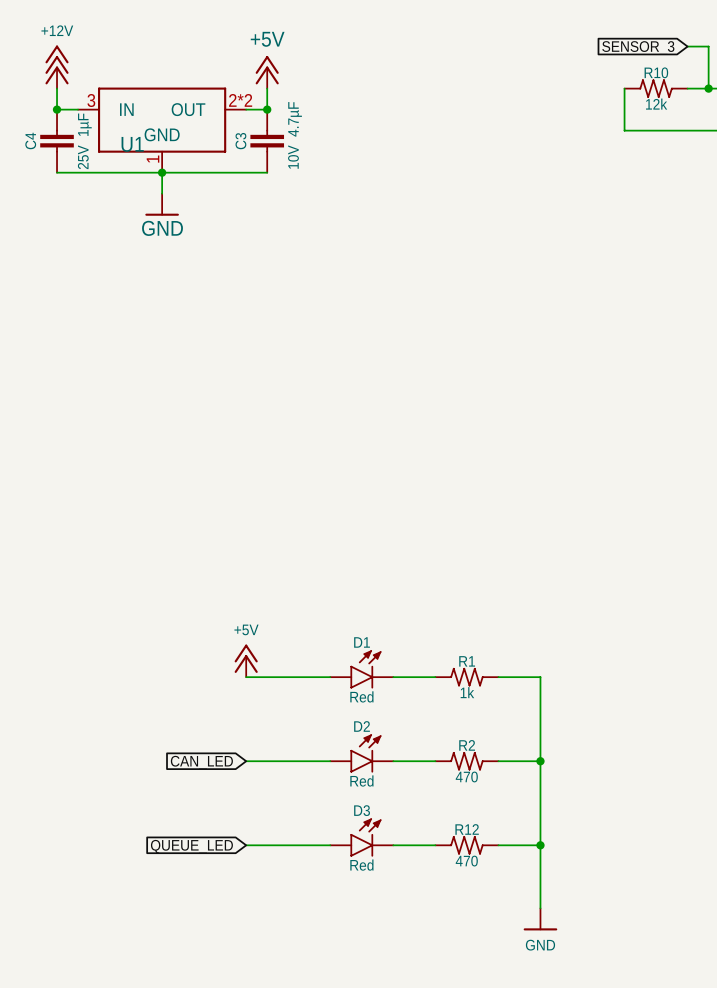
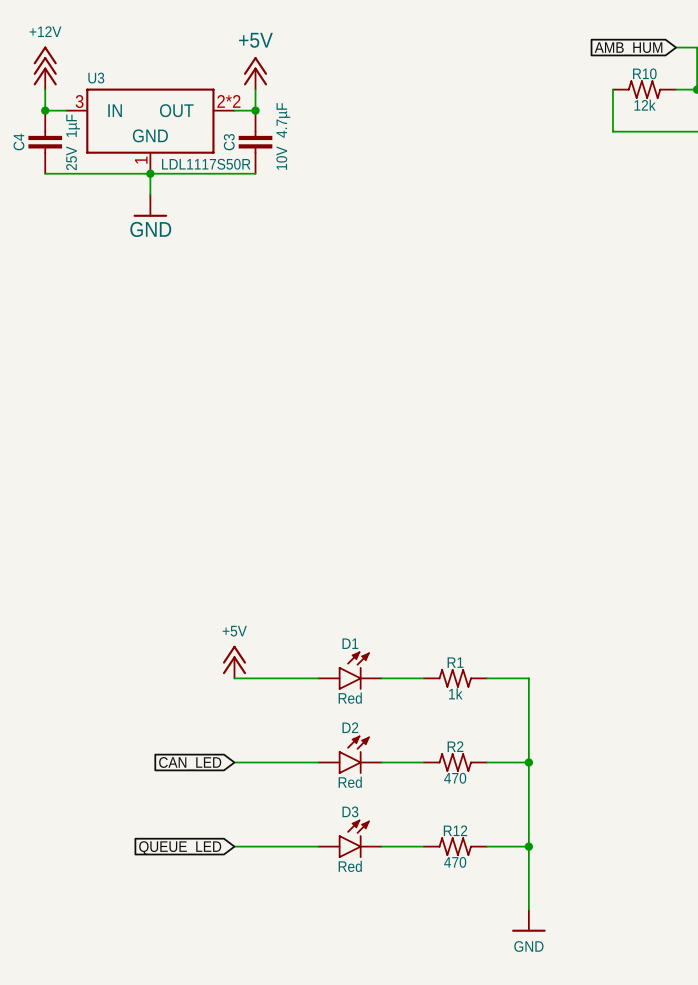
global label: SENSOR_3 (638, 48) -> AMB_HUM (628, 49)
U1 name: U1 (132, 144) -> U3 (96, 78)
U1 text: none -> LDL1117S50R (206, 164)

